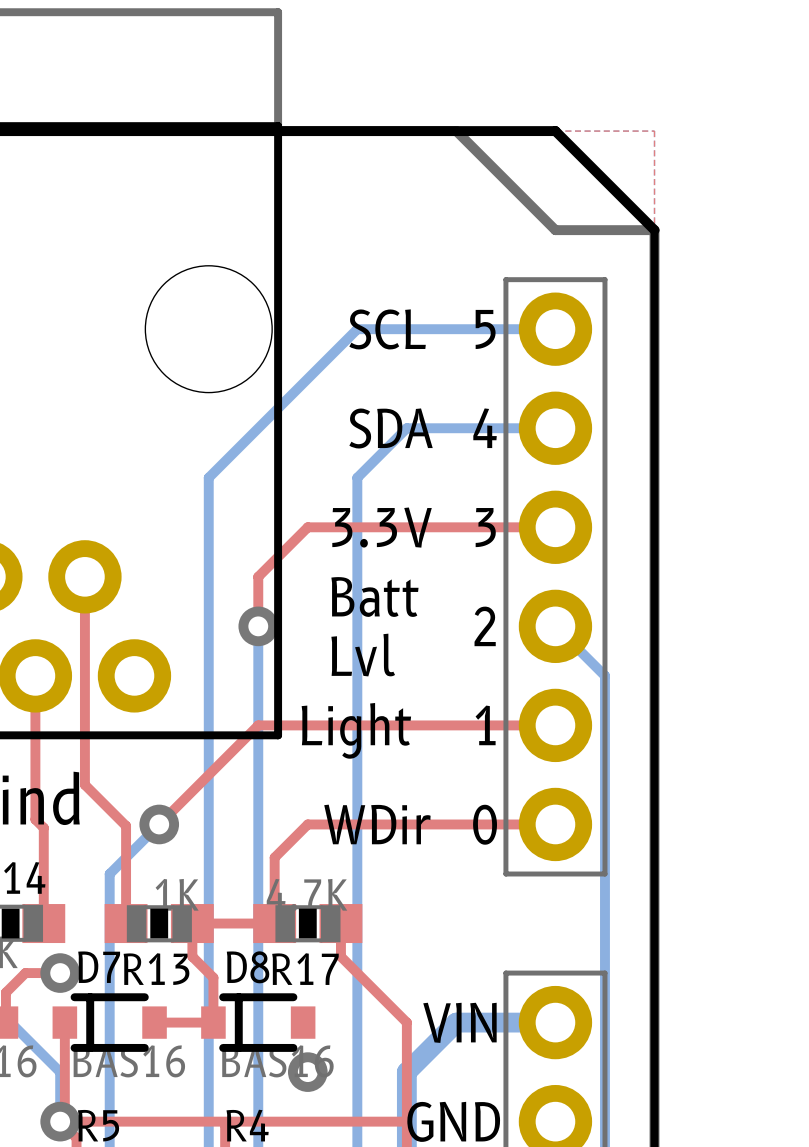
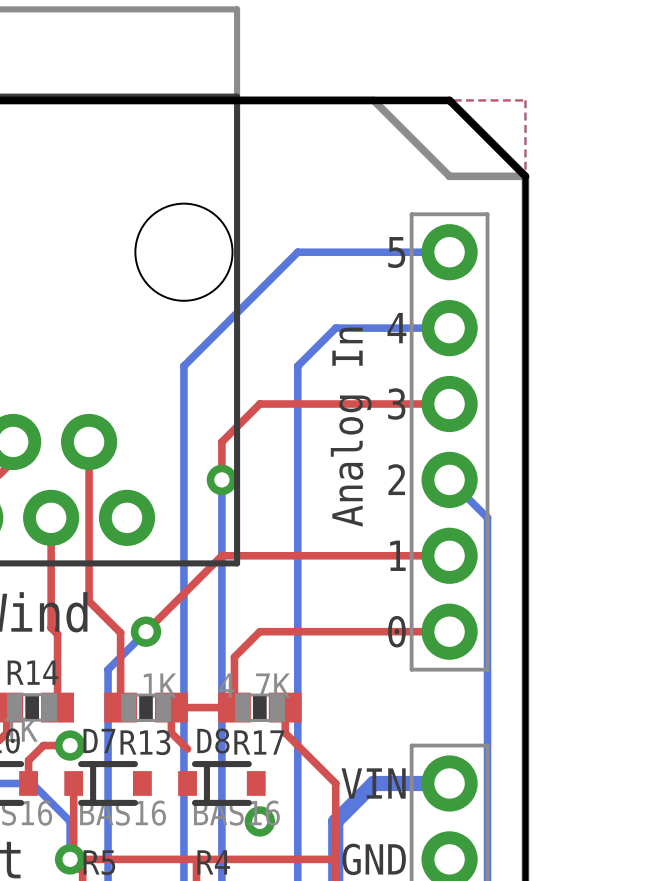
text: SCL (387, 329) -> none
text: SDA (391, 428) -> none
text: 3.3V (382, 527) -> none
part text: none -> Analog In (351, 427)
text: Batt (374, 596) -> none
text: Lvl (363, 655) -> none
text: Light (356, 730) -> none
text: WDir (377, 824) -> none
top track: (213, 977) (213, 1022) (154, 1022) -> none

